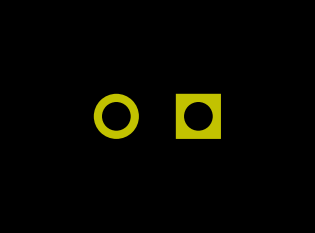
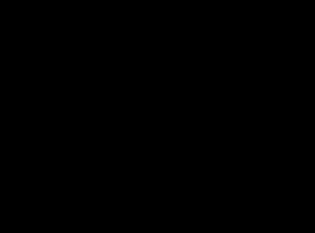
part: (157, 116) -> none

